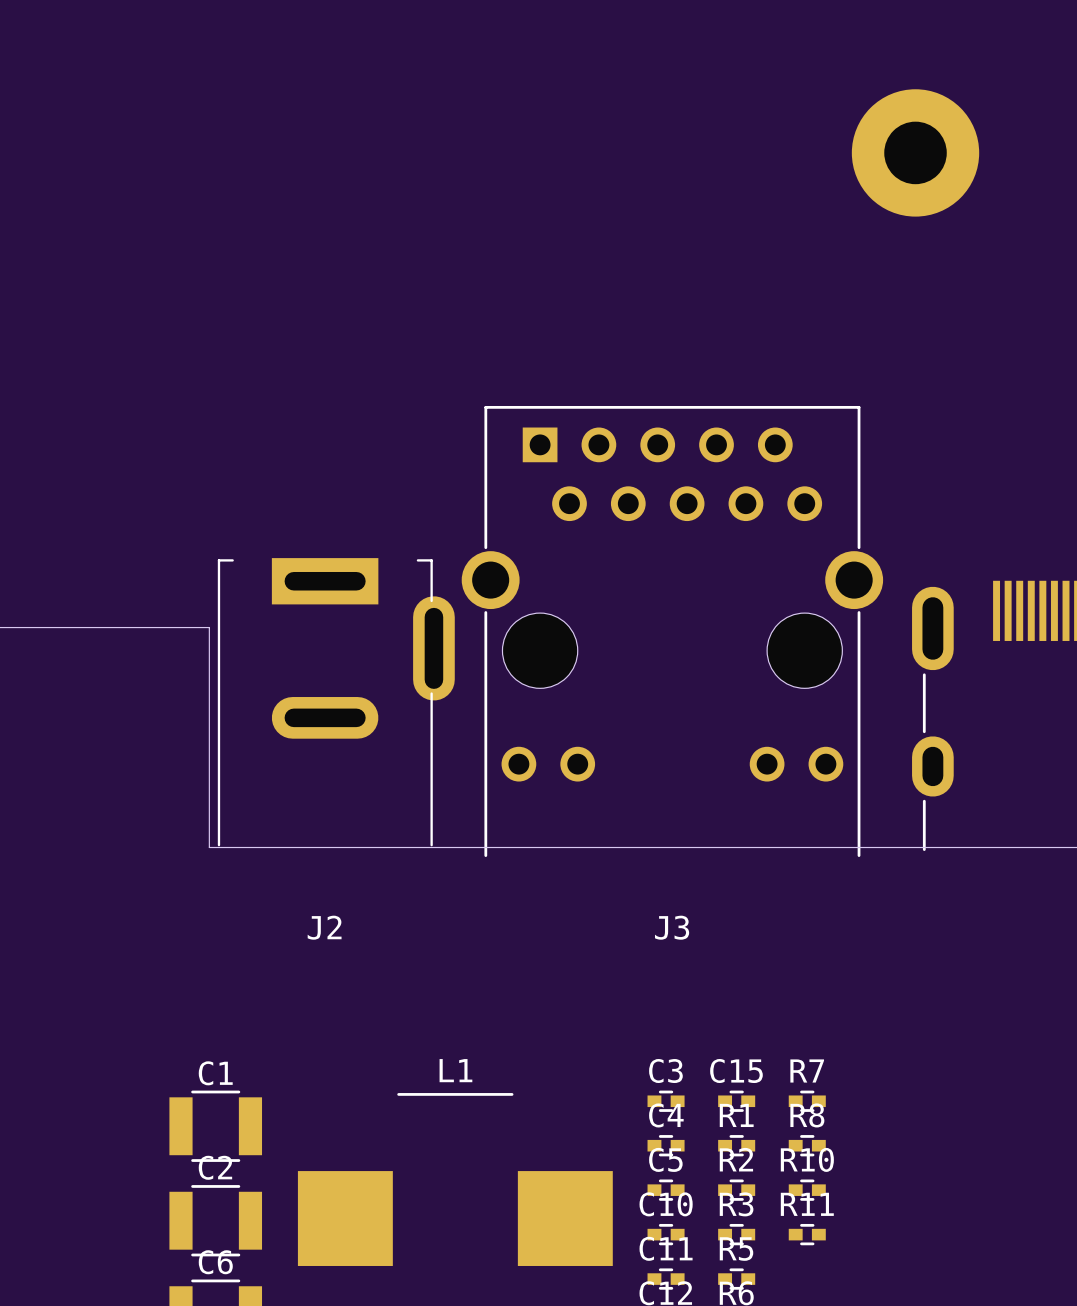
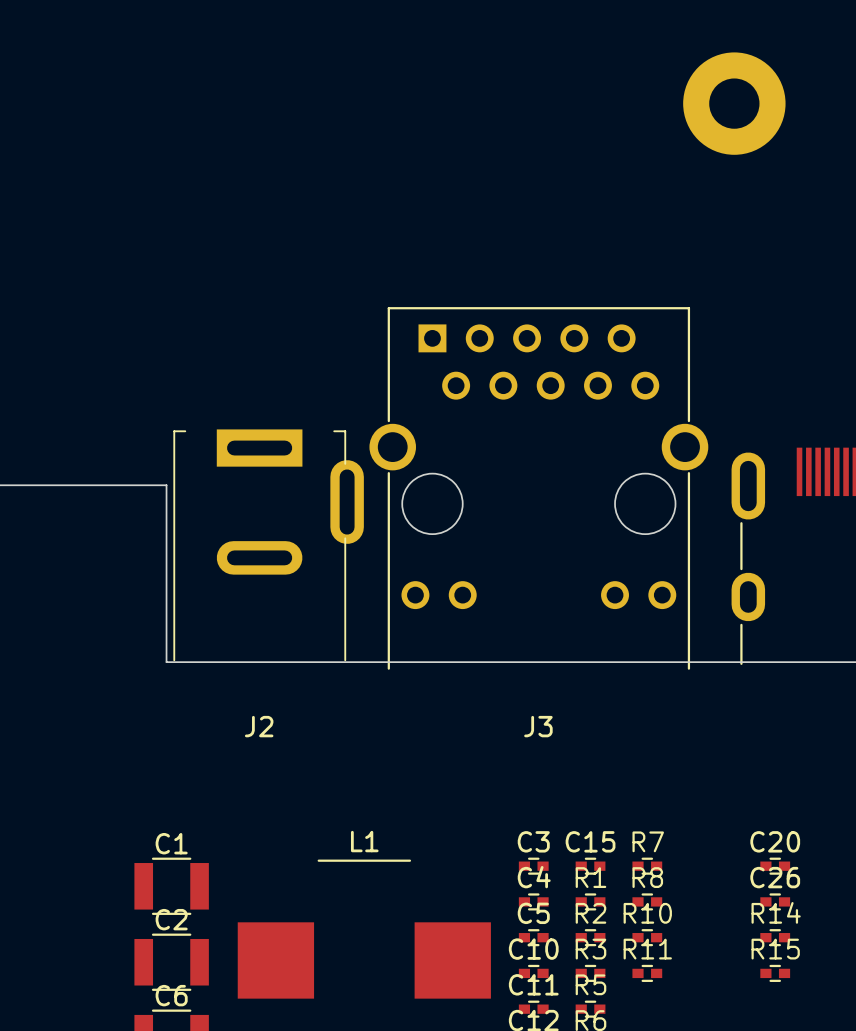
C20: none -> (775, 866)
C26: none -> (775, 901)
R14: none -> (775, 937)
R15: none -> (775, 973)

